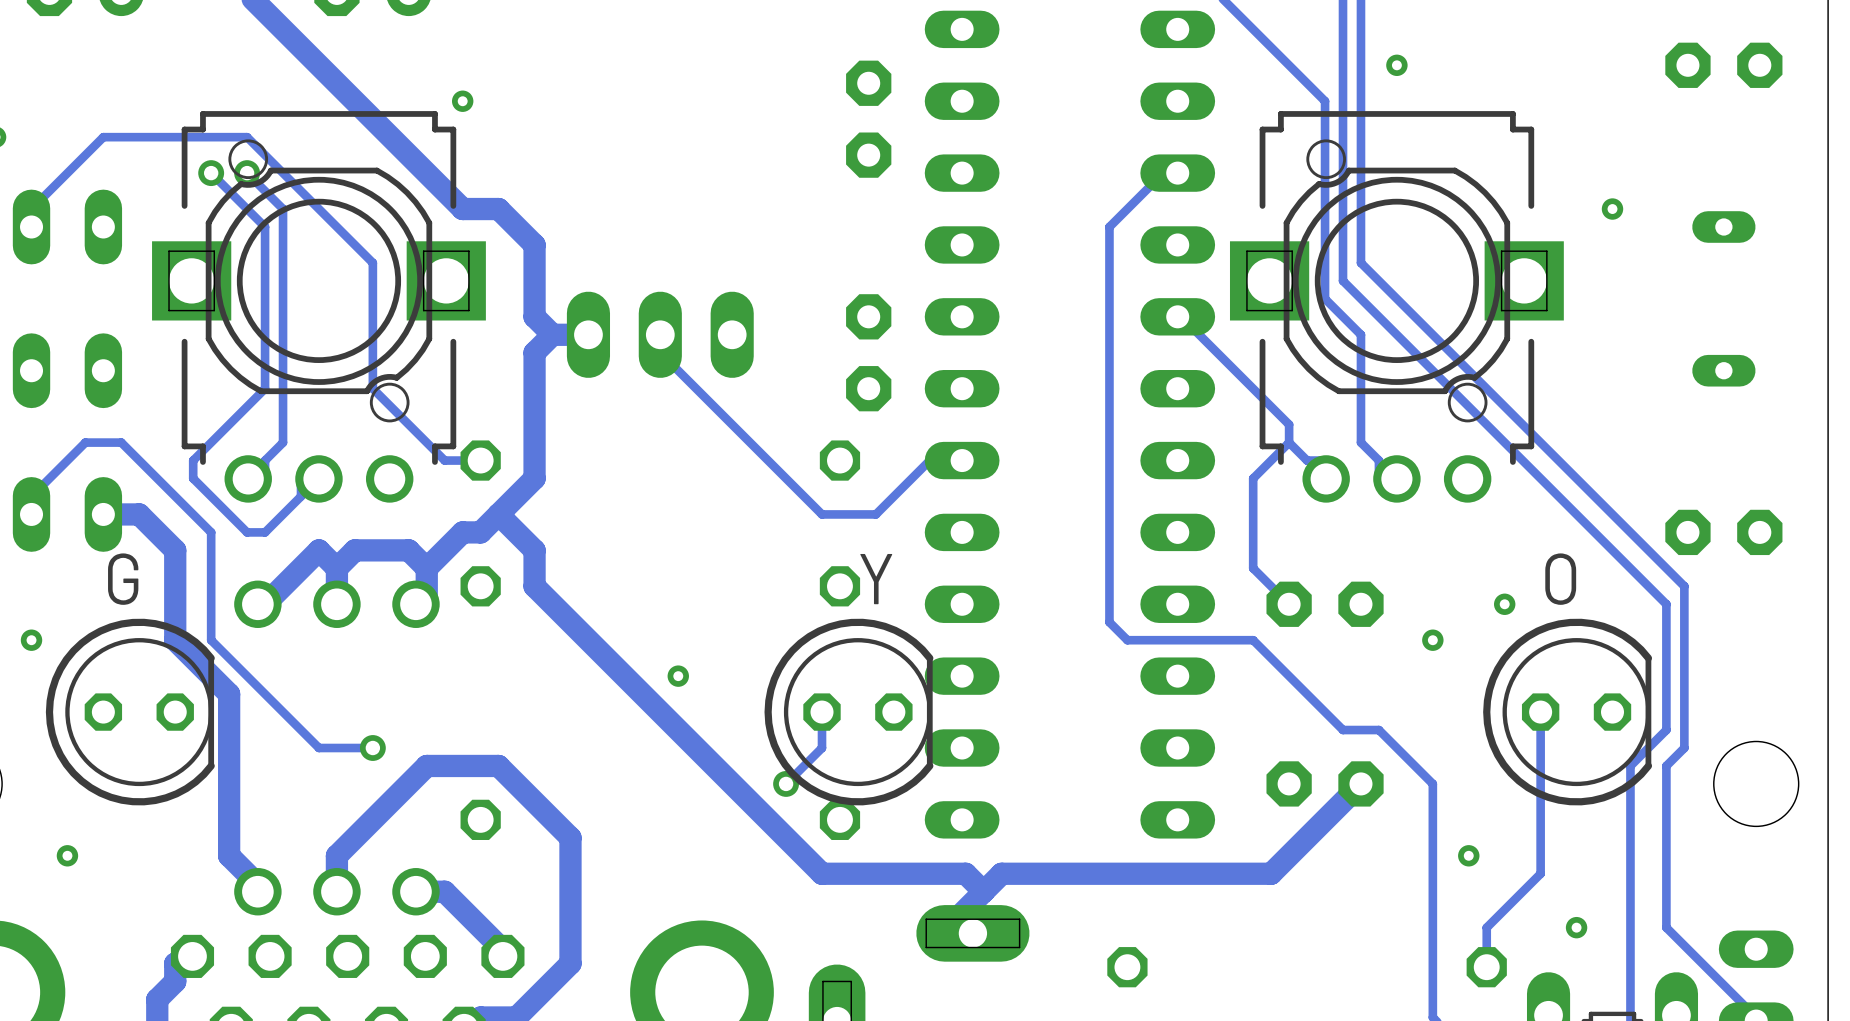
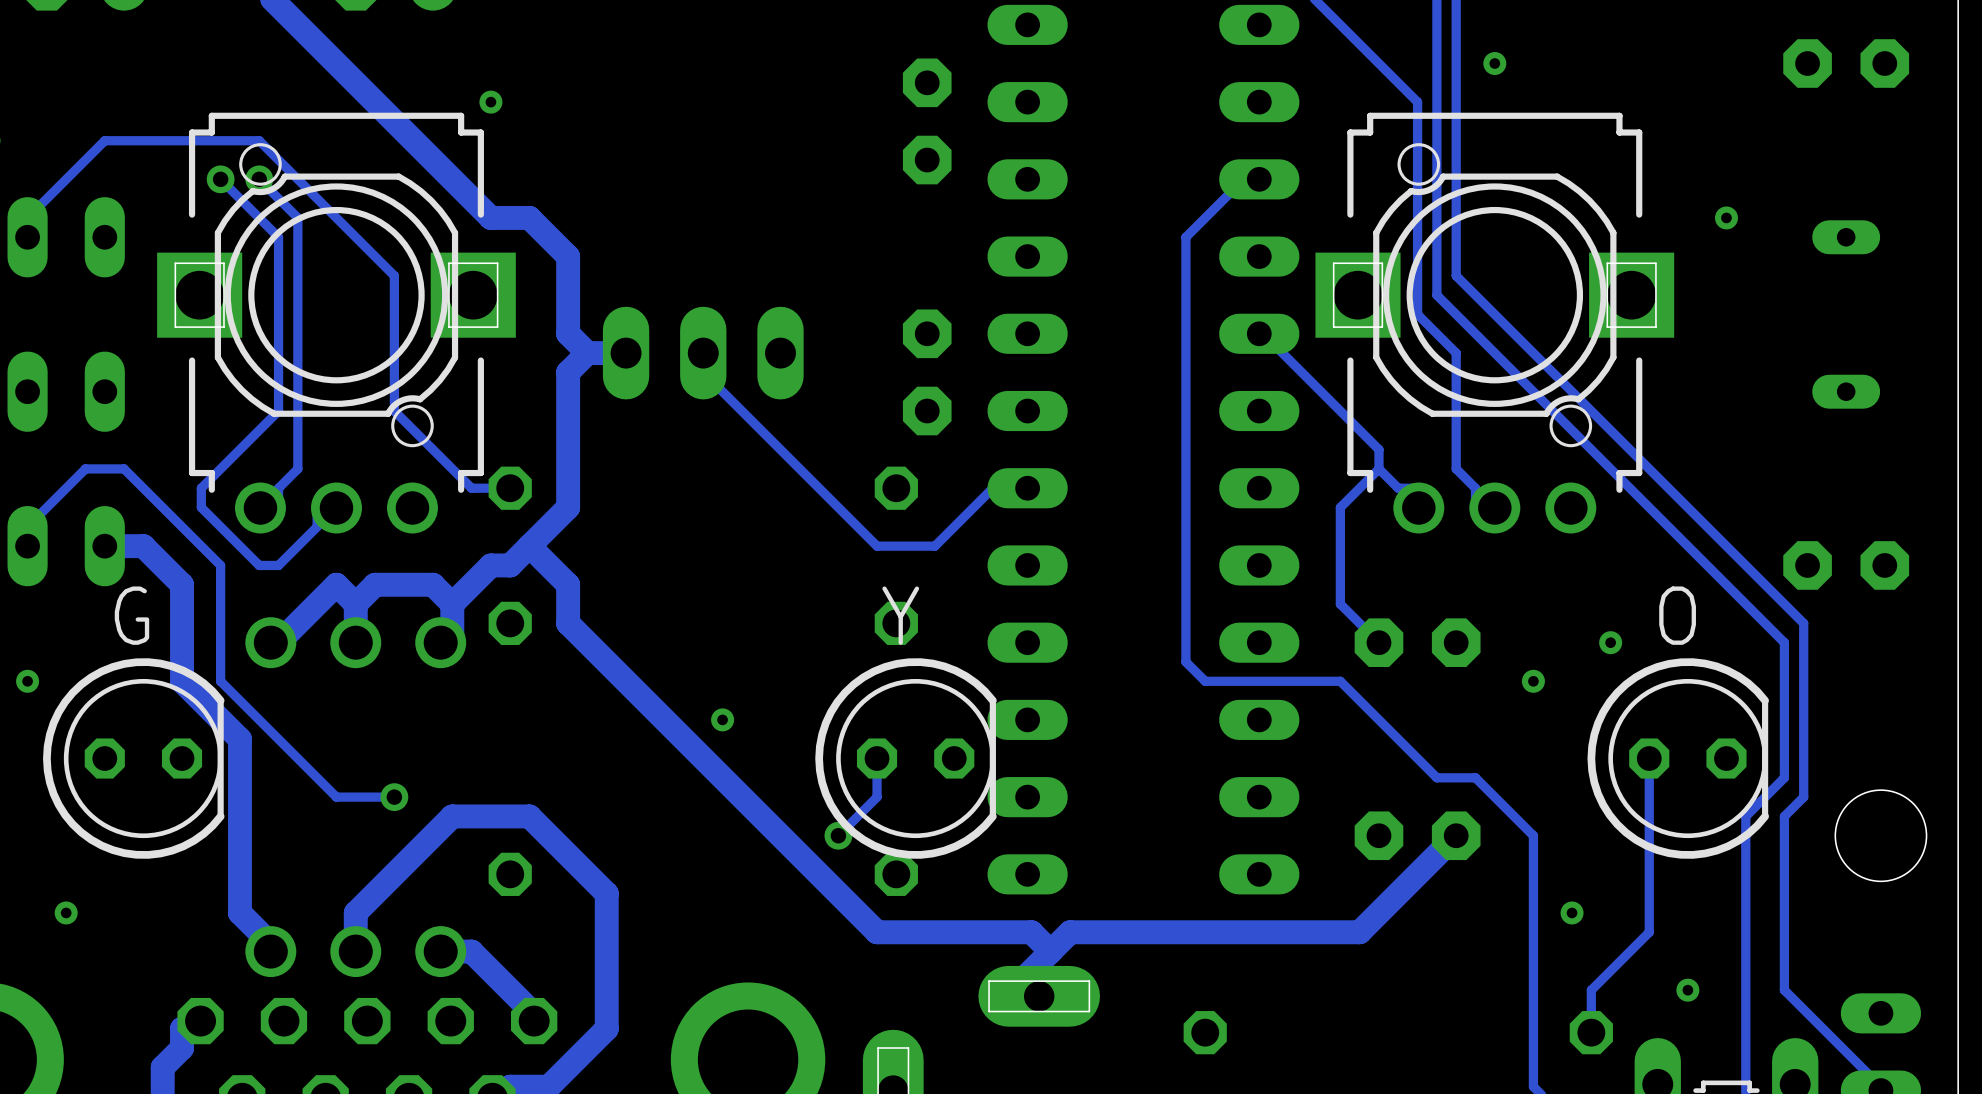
text position: Y (876, 579) -> Y (900, 615)

